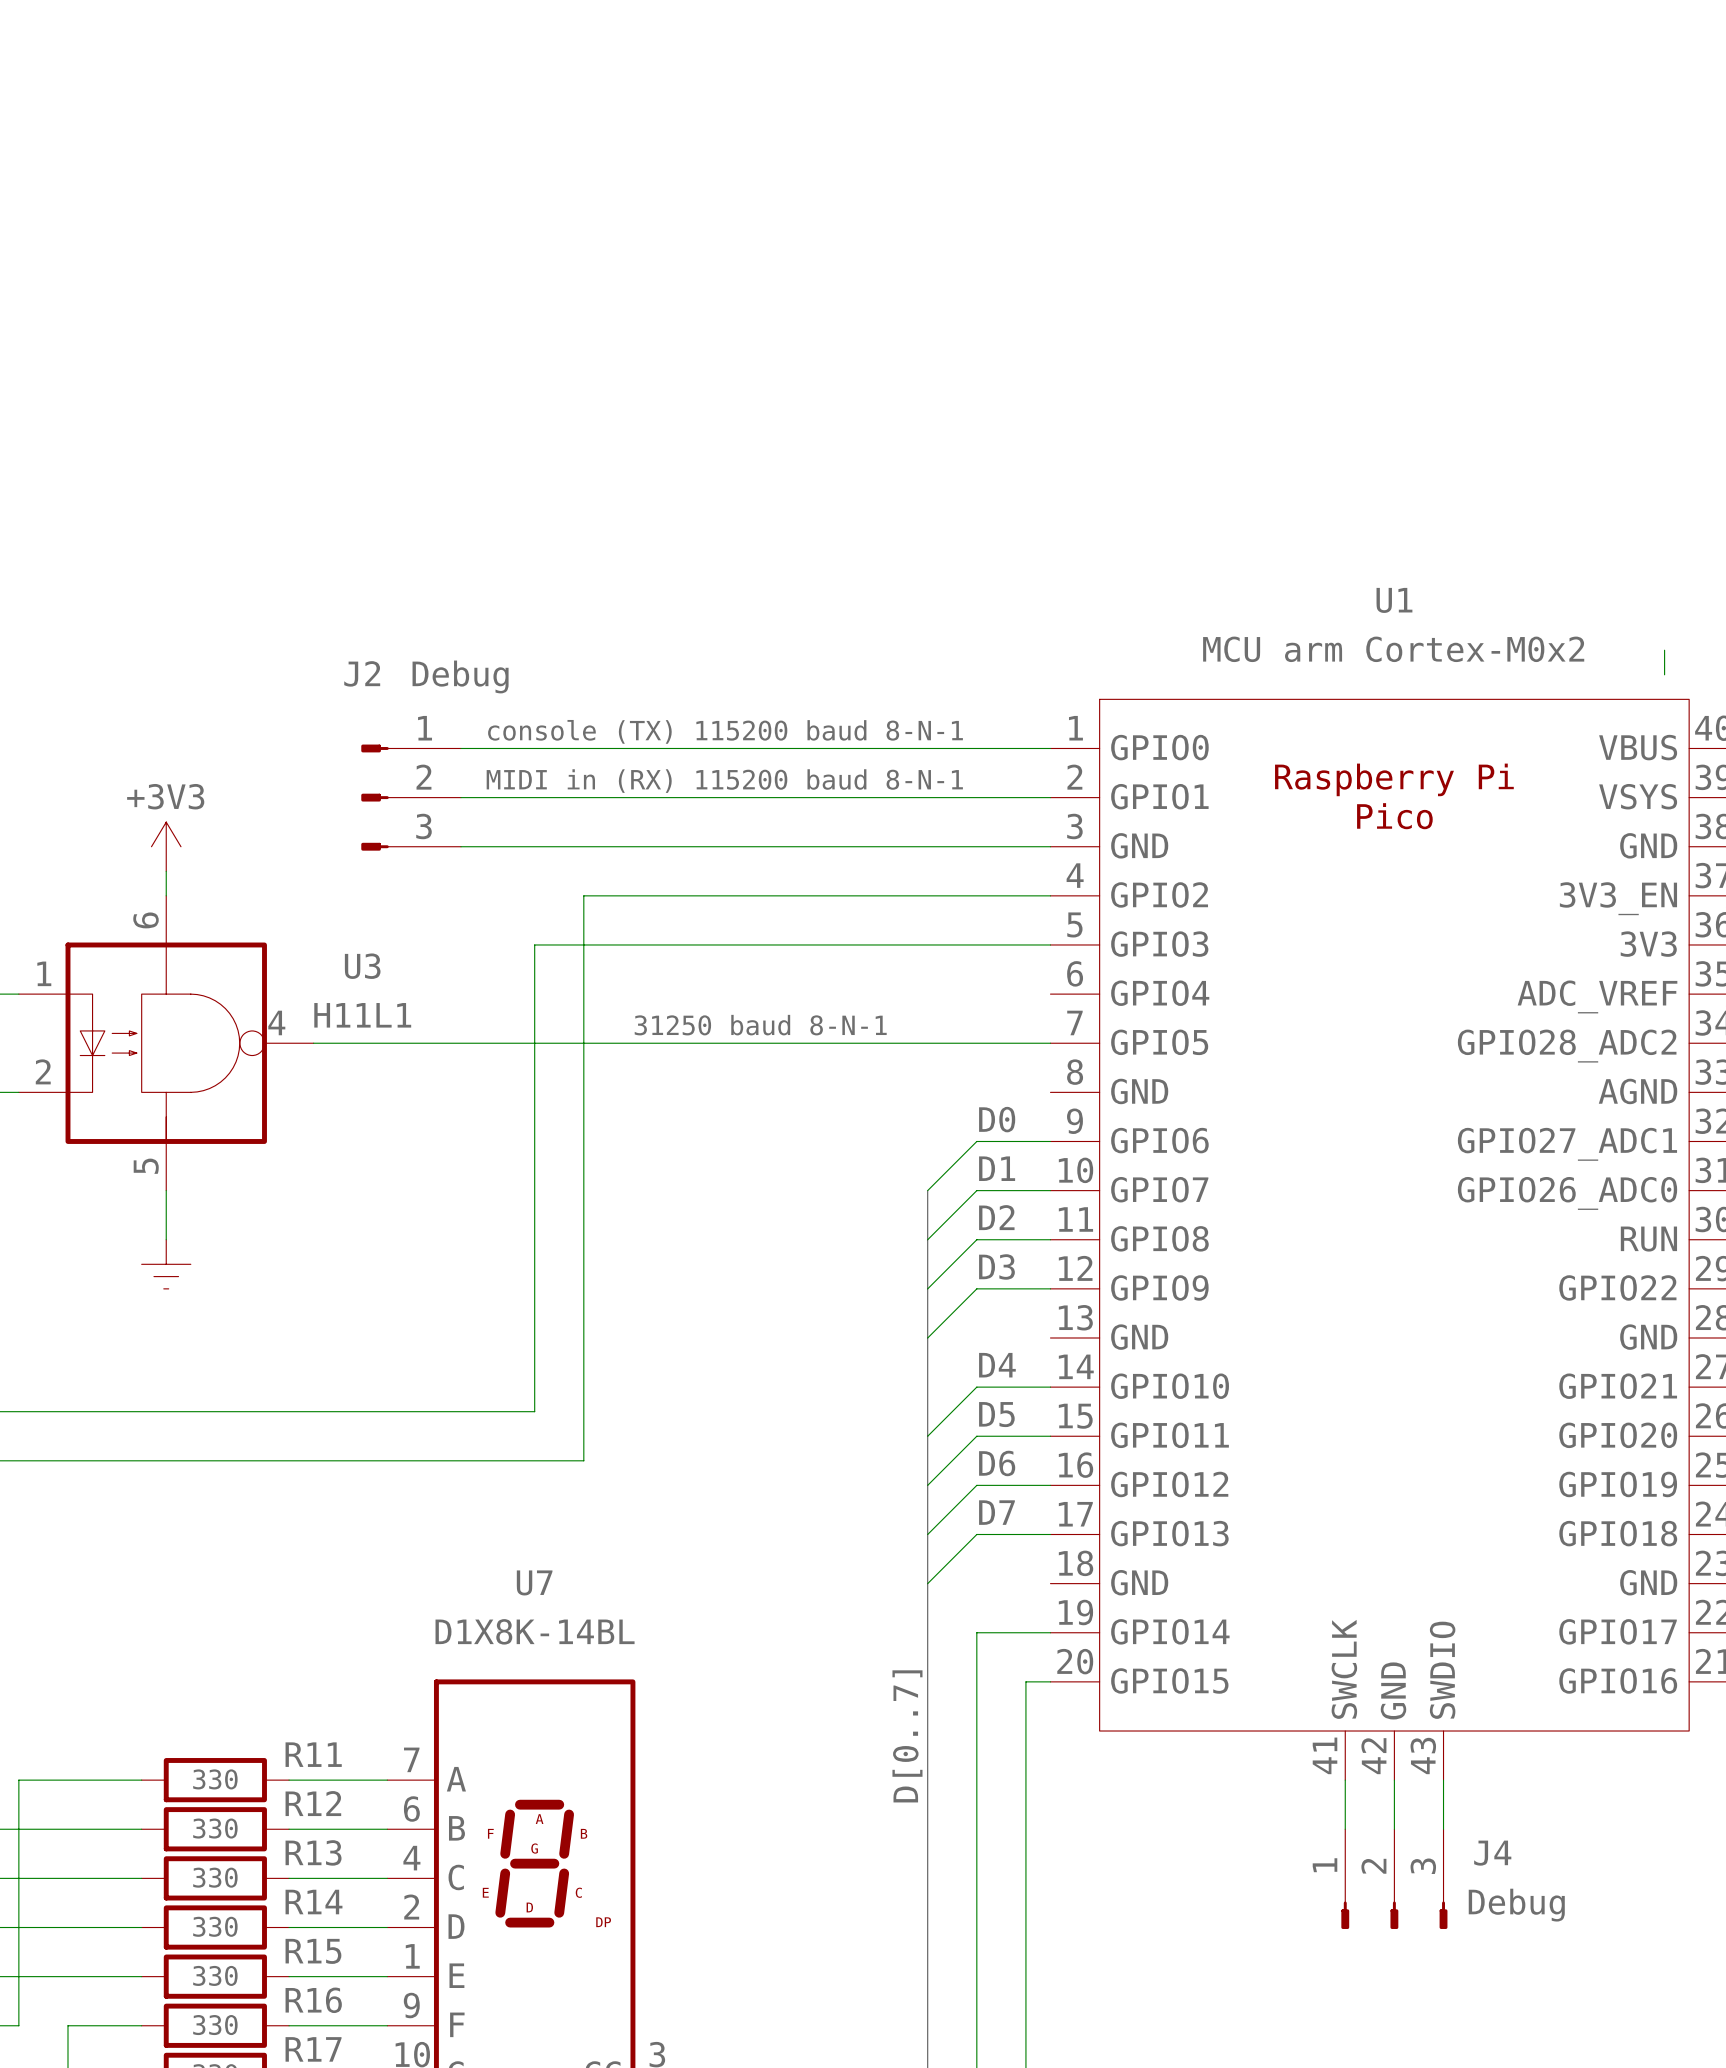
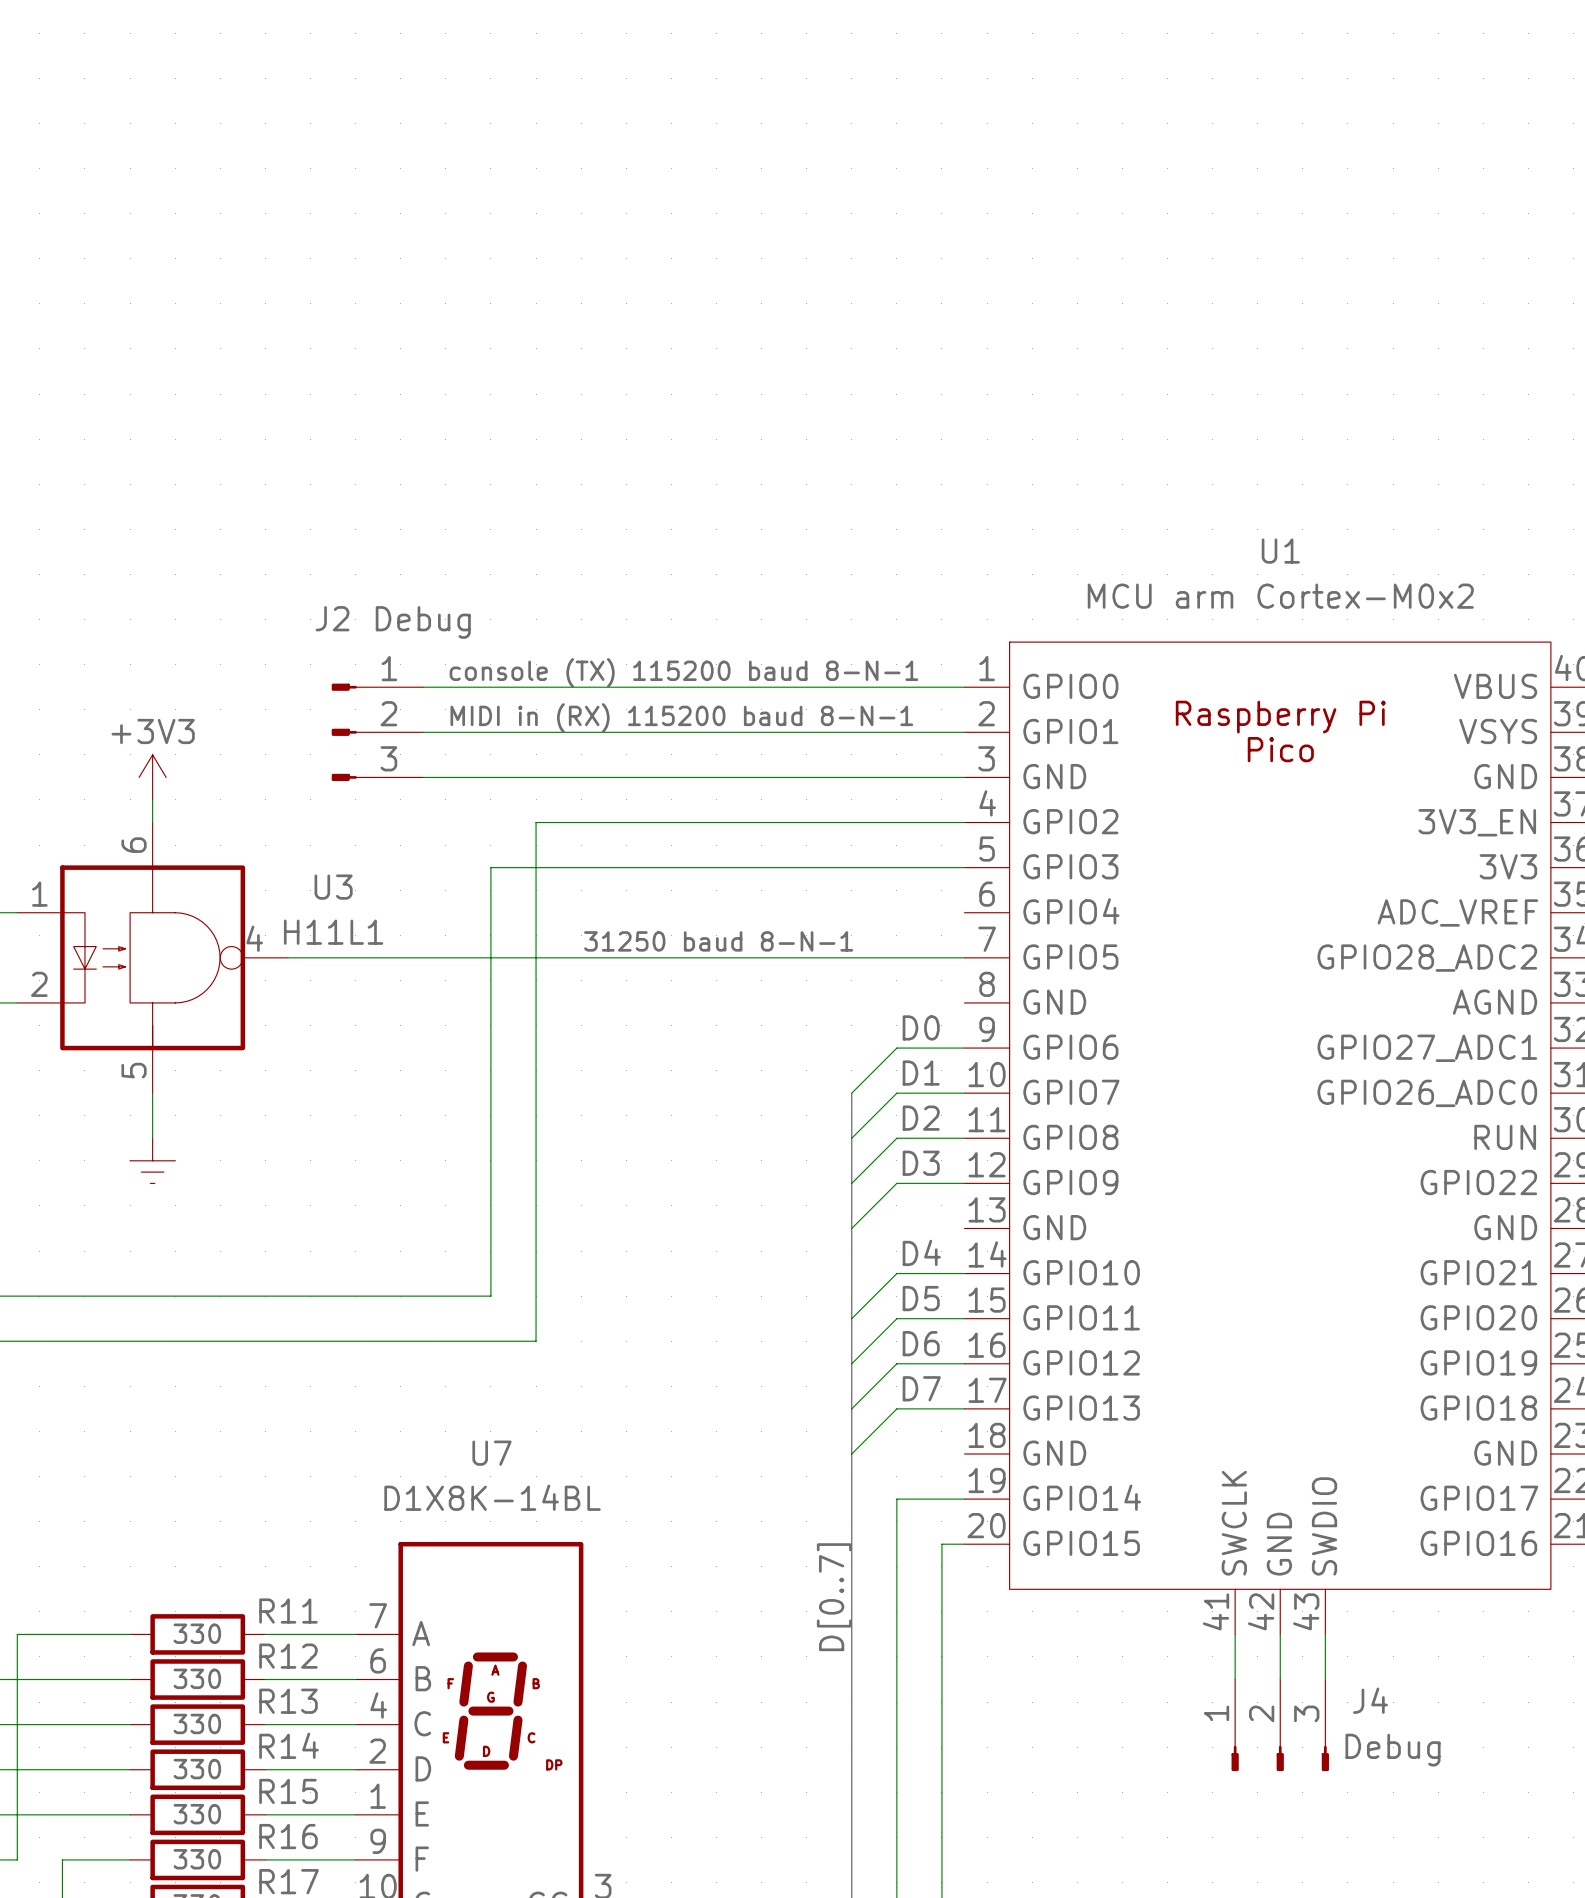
wire: (1664, 650) (1664, 674) -> none

